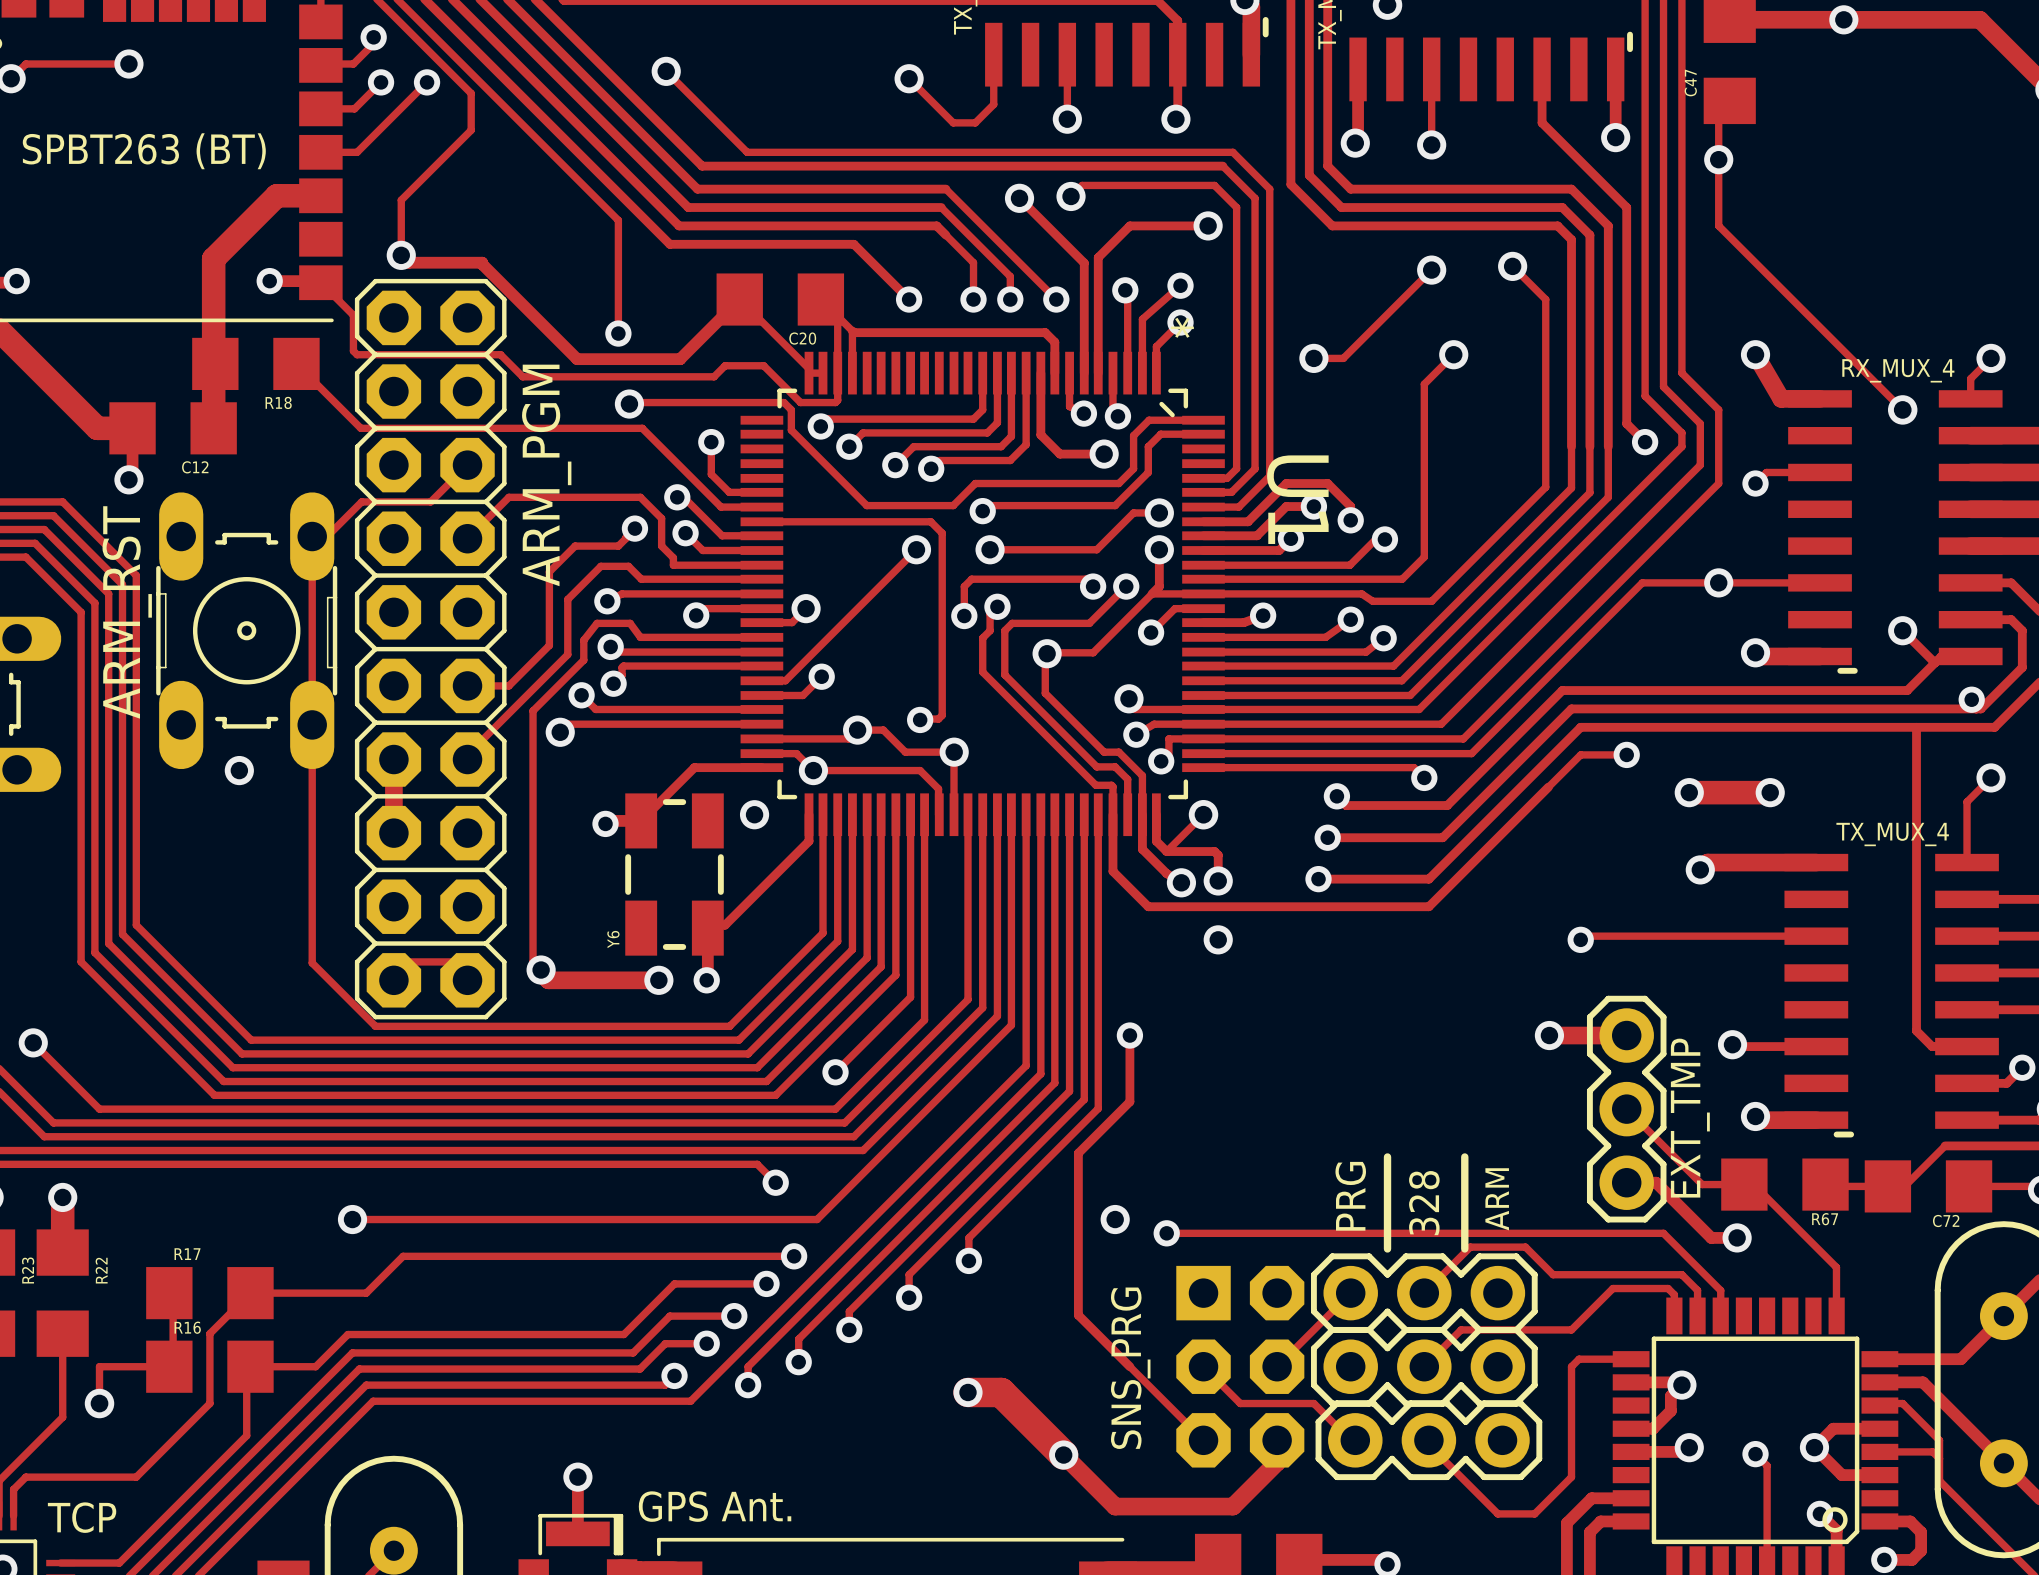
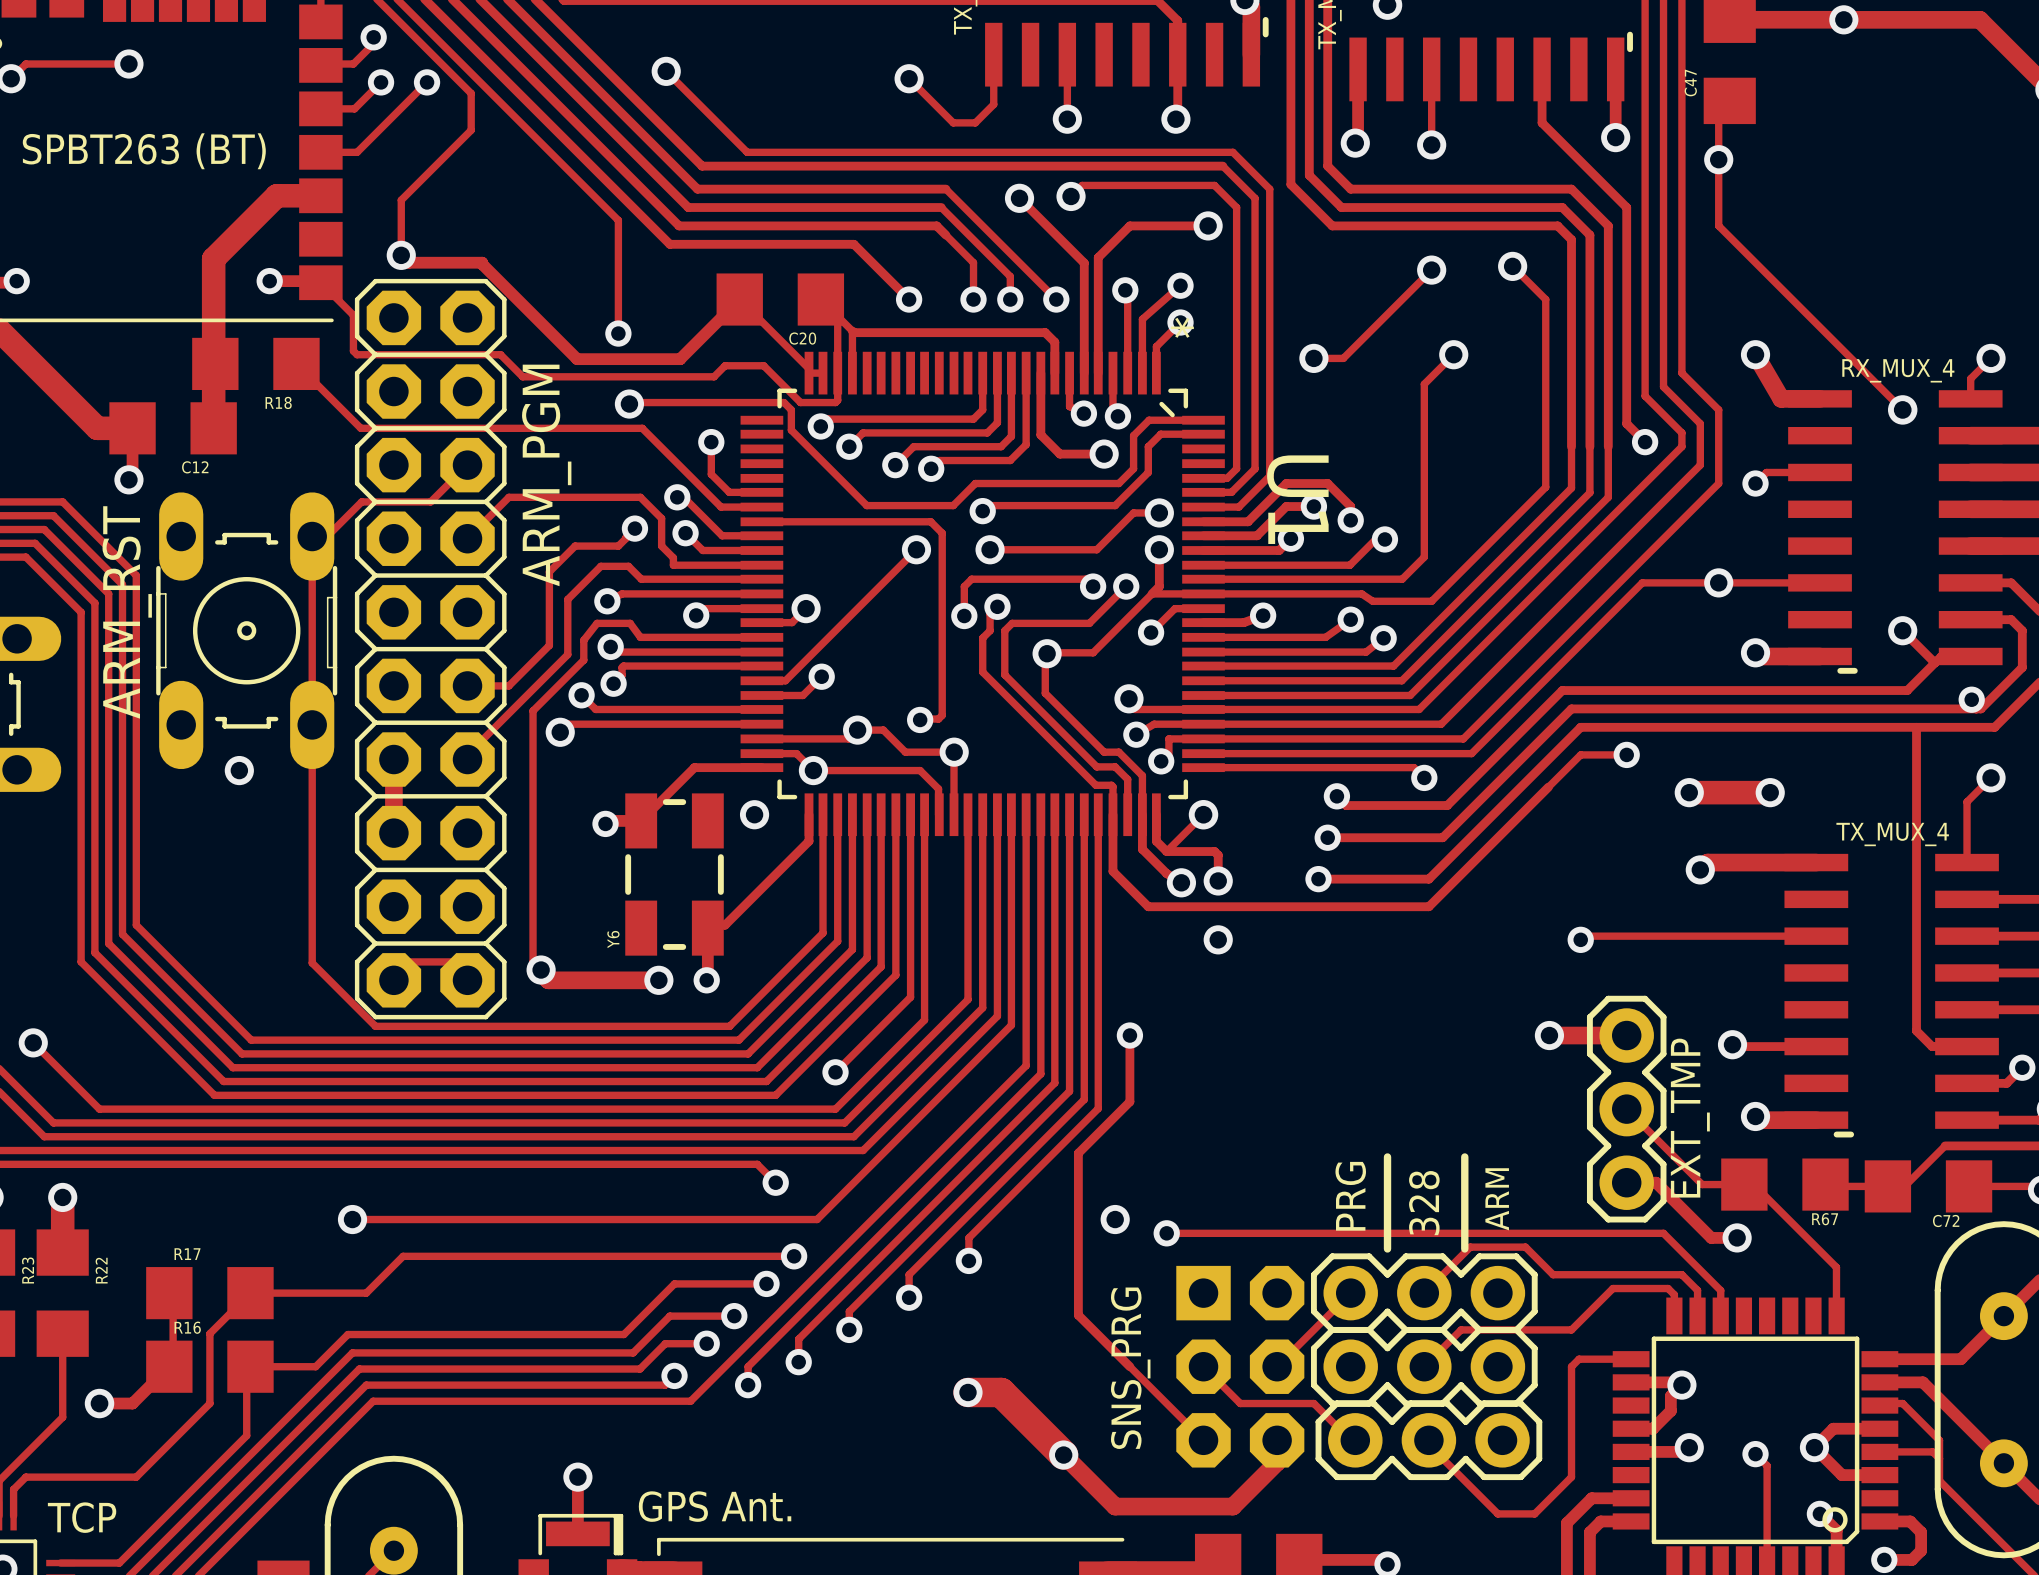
track: (169, 1366) (99, 1366) (99, 1403) -> (169, 1366) (132, 1403) (99, 1403)

